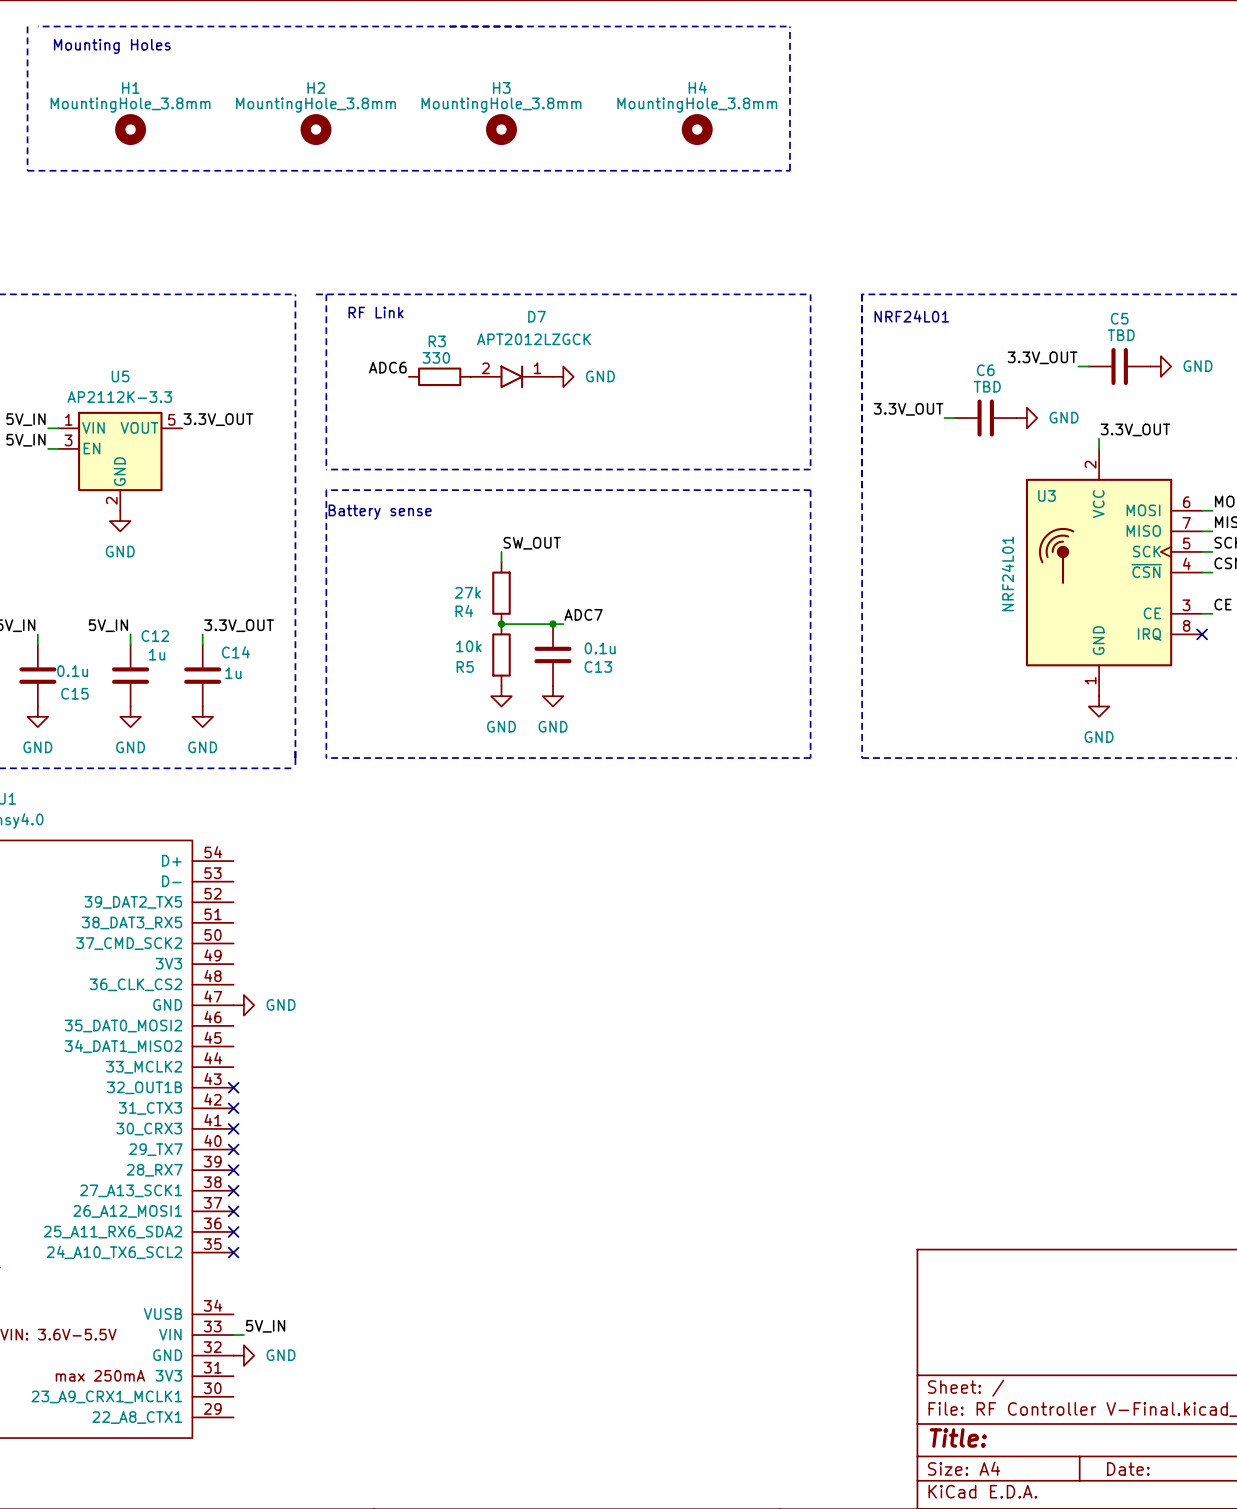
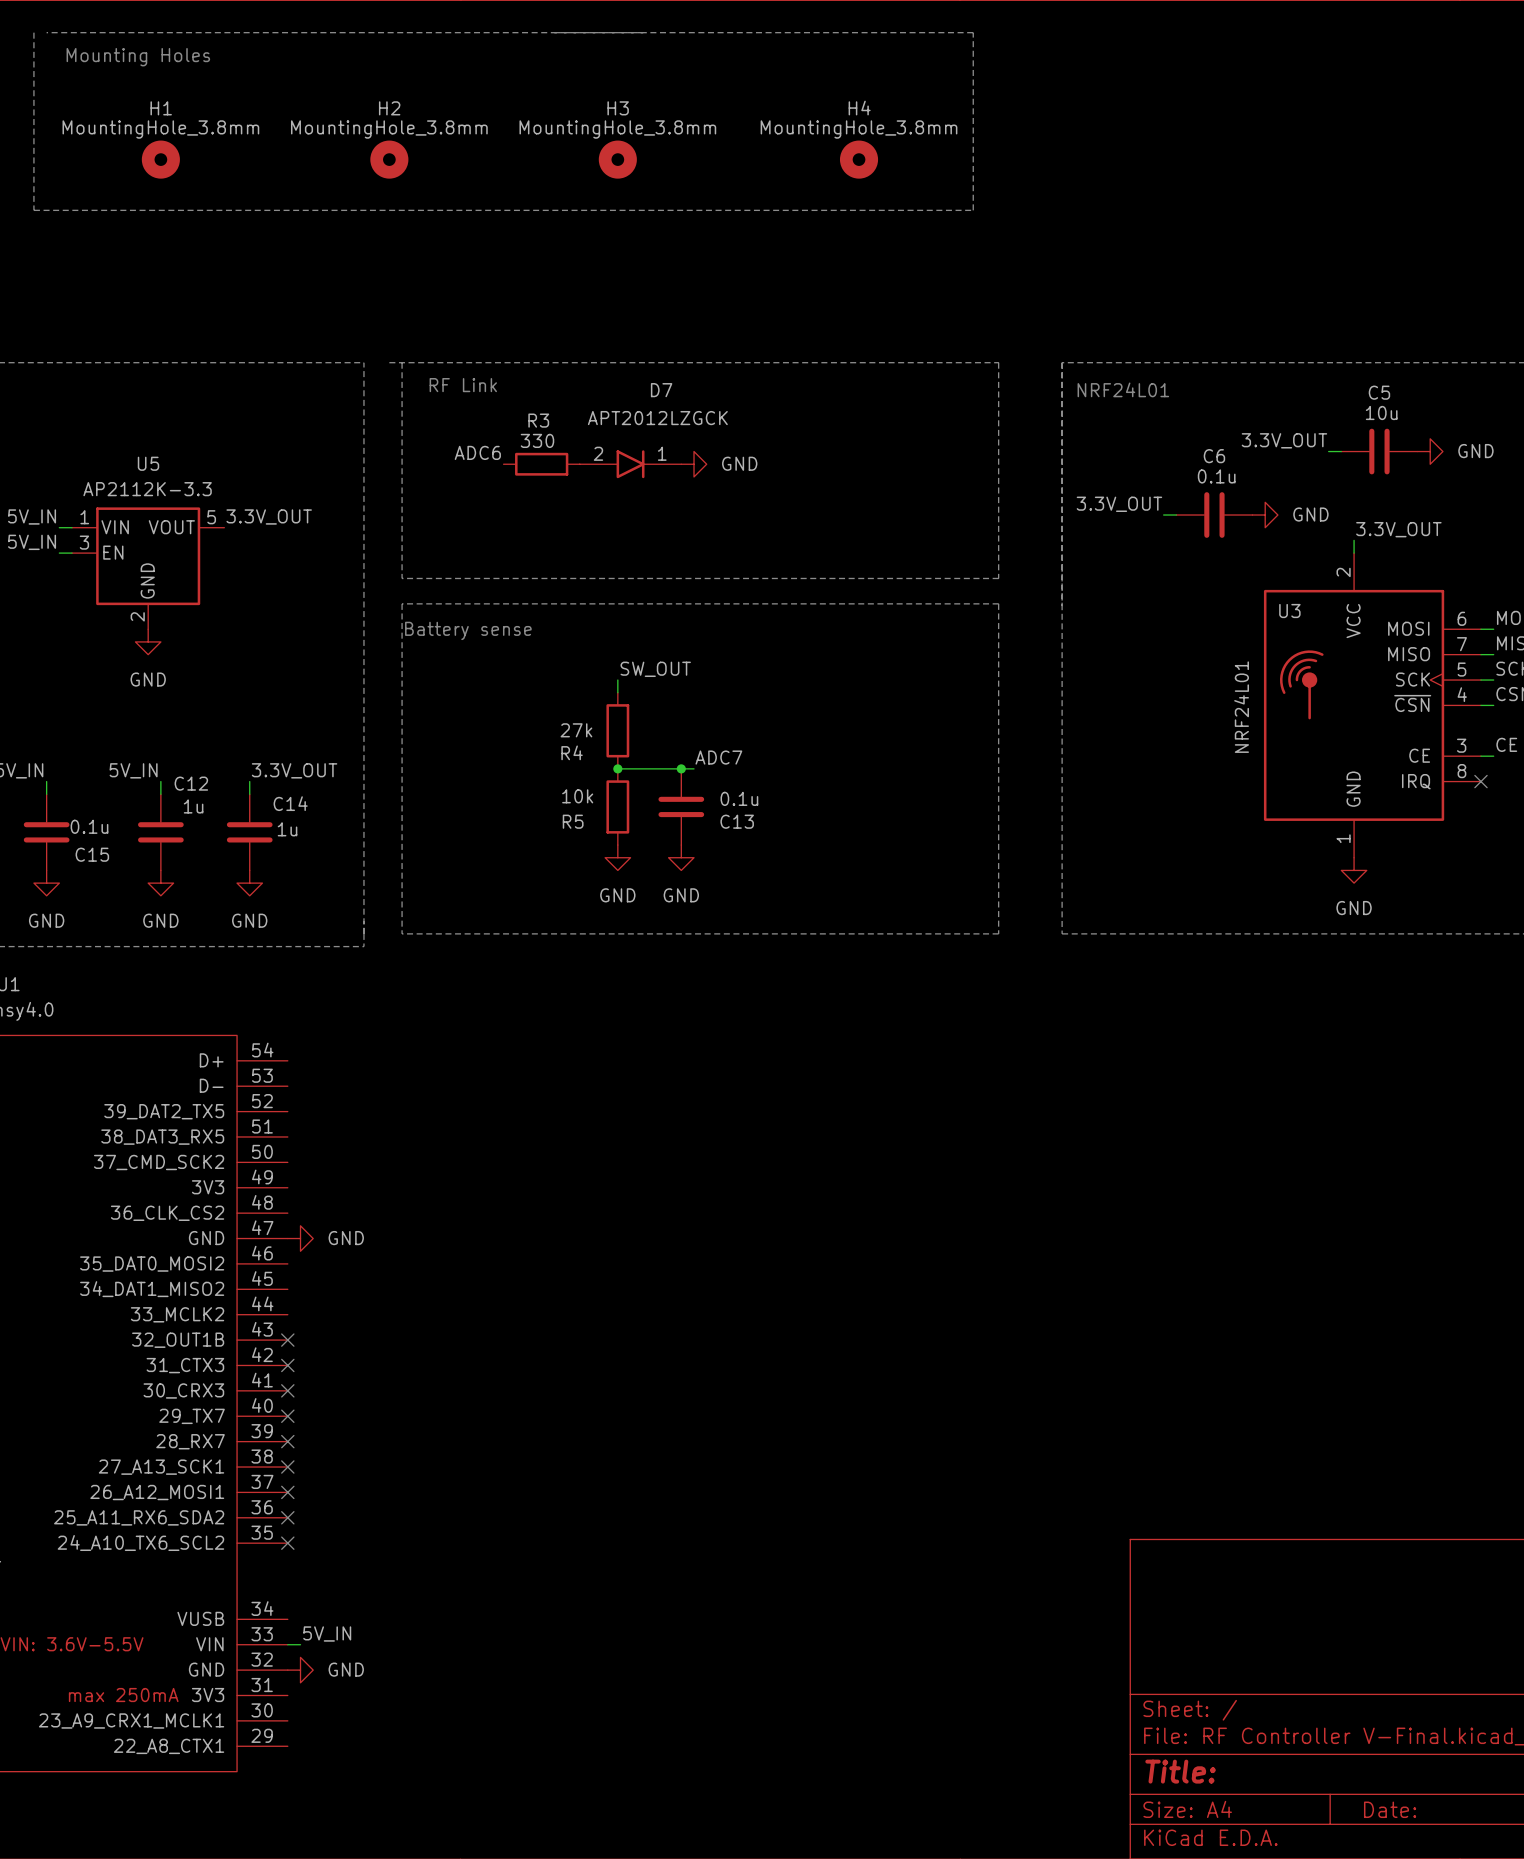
C5 value: TBD (1121, 335) -> 10u (1381, 412)
C6 value: TBD (987, 386) -> 0.1u (1216, 476)

